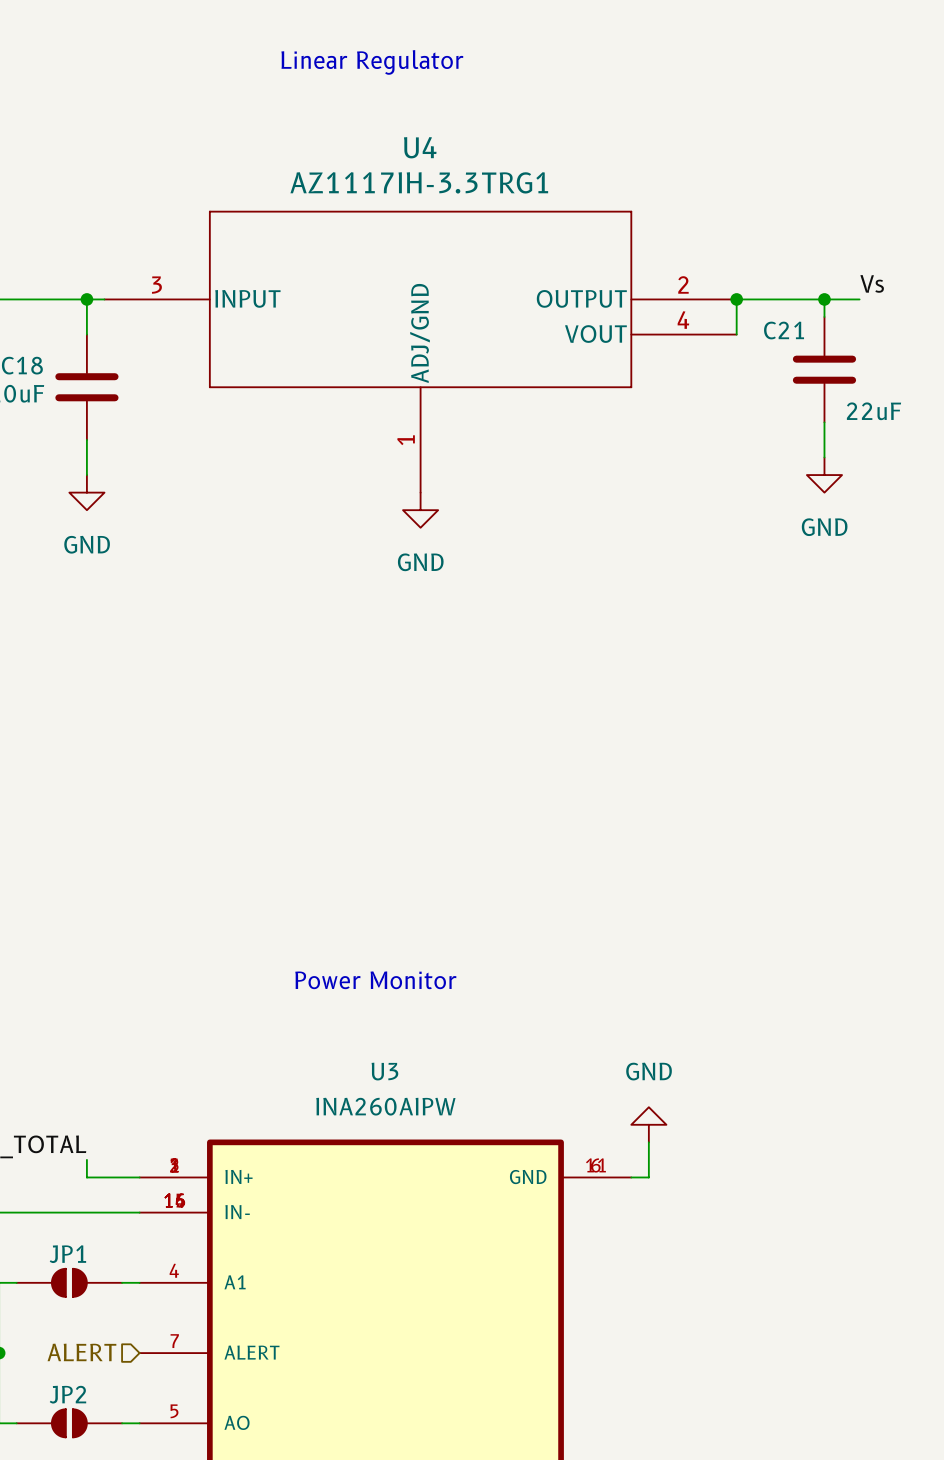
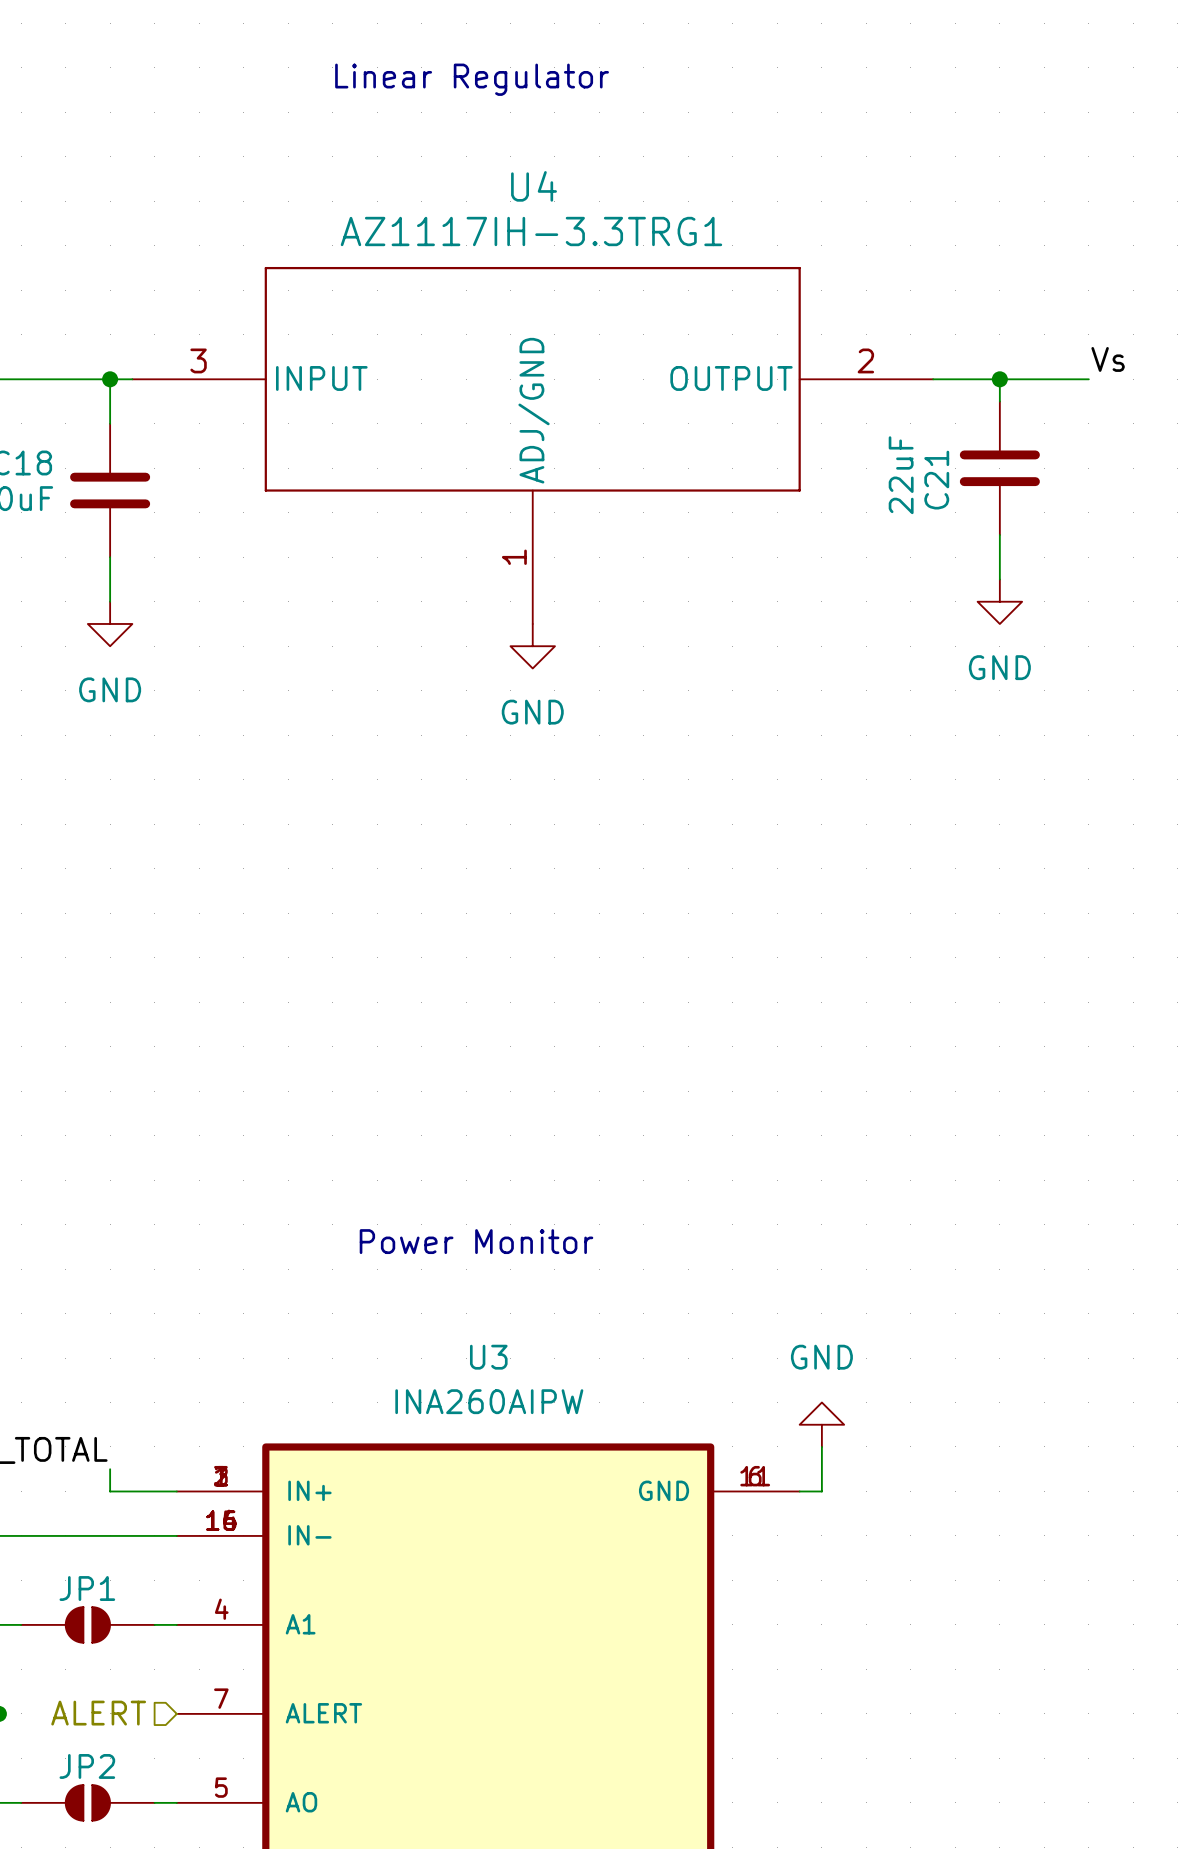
U4 symbol: [104, 210, 737, 493] -> [132, 266, 934, 624]
wire: (736, 299) (736, 334) -> none
junction: (736, 299) -> none
junction: none -> (999, 379)
wire: (824, 299) (824, 317) -> (999, 379) (999, 401)
junction: (824, 299) -> none
C21 name rotation: 0° (784, 330) -> 90° counterclockwise (936, 480)
C21 position: (824, 369) -> (999, 468)
C21 value rotation: 0° (874, 411) -> 90° counterclockwise (901, 475)
C21 value position: 22uF (874, 411) -> 22uF (901, 475)
wire: (824, 422) (824, 457) -> (999, 535) (999, 579)
power symbol position: GND (824, 475) -> GND (999, 601)

